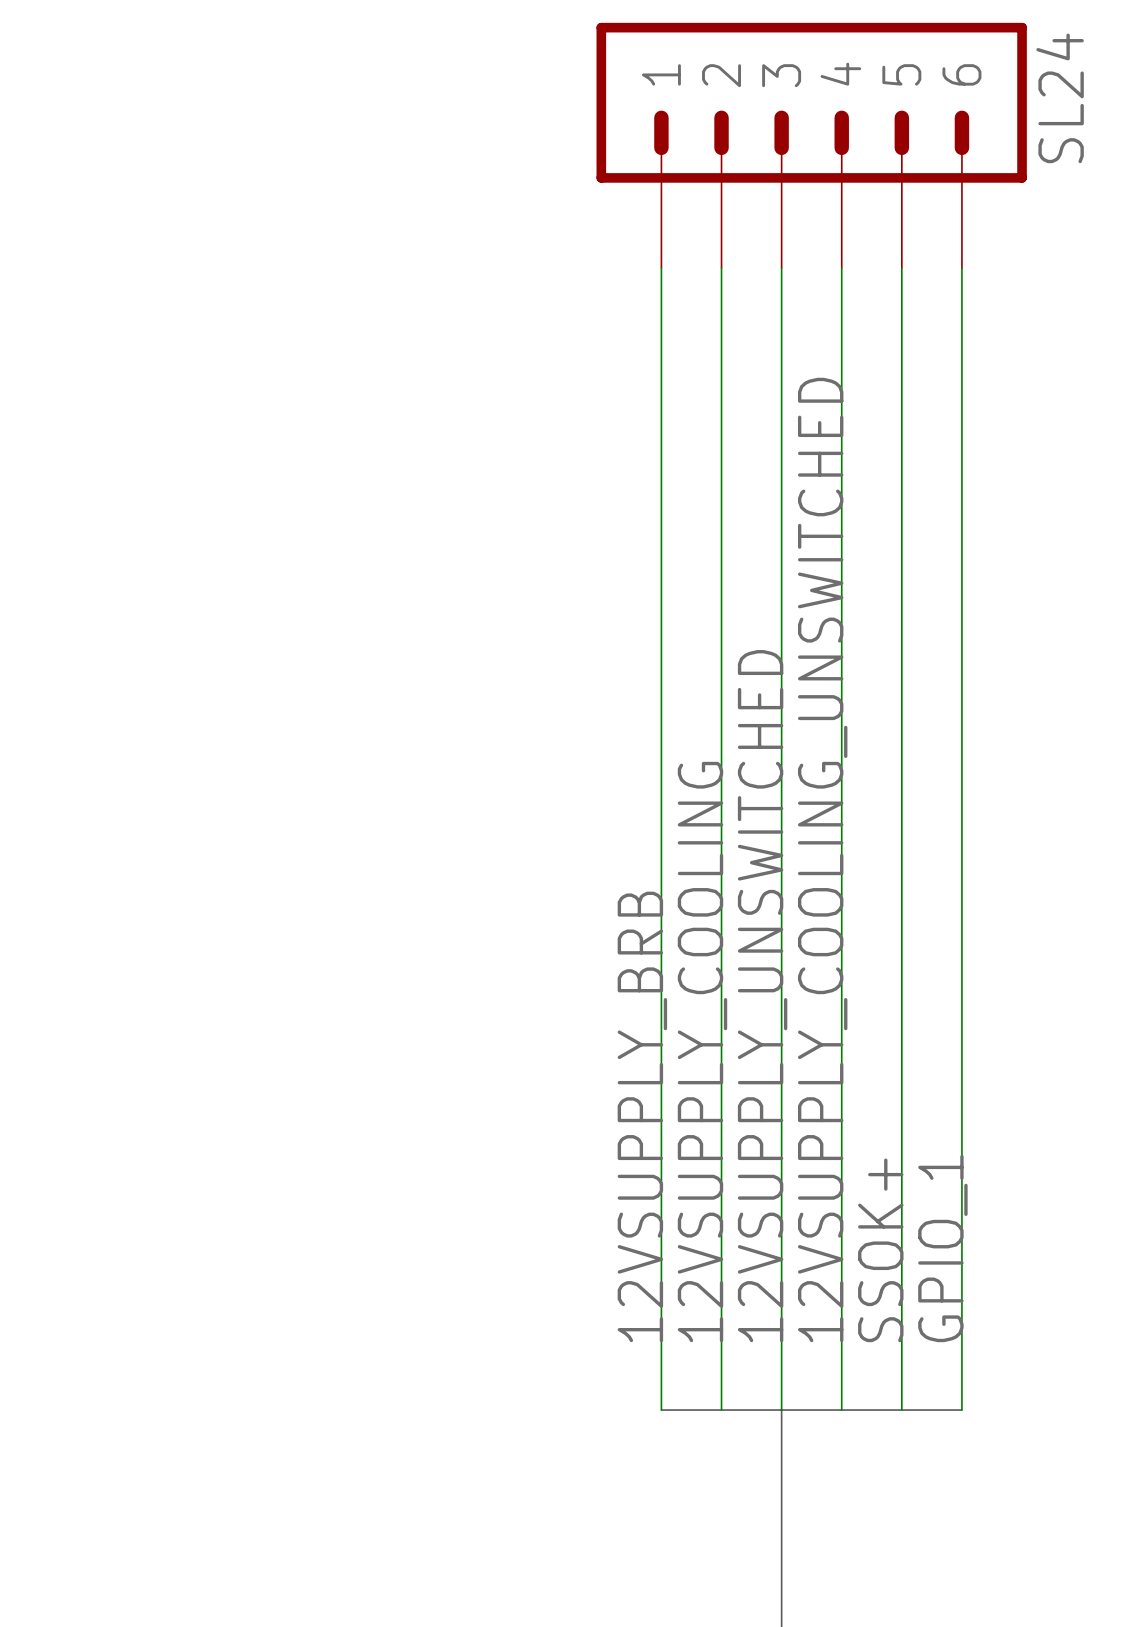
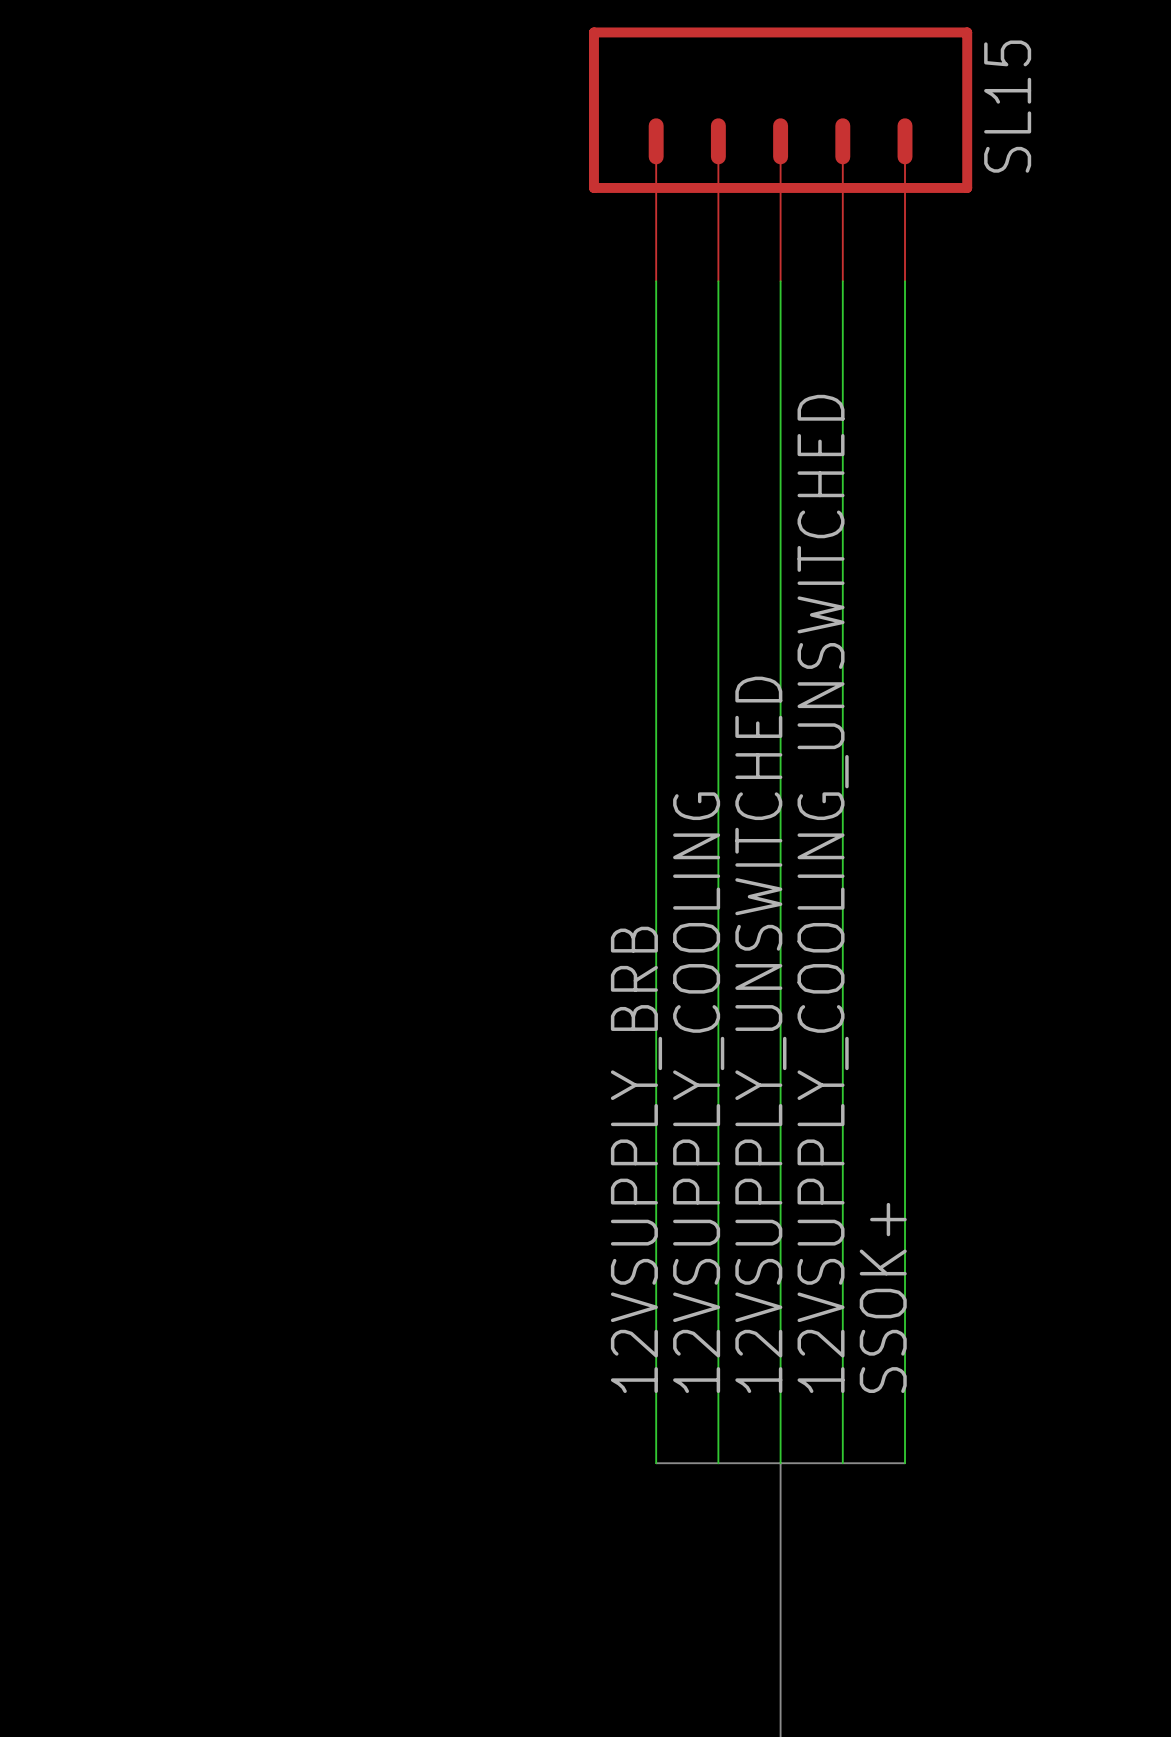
SL15: none -> (780, 154)
SL24: (811, 145) -> none
wire: (961, 268) (961, 1410) -> none
label: GPIO_1 (942, 1248) -> none
bus: (901, 1410) (961, 1410) -> none

